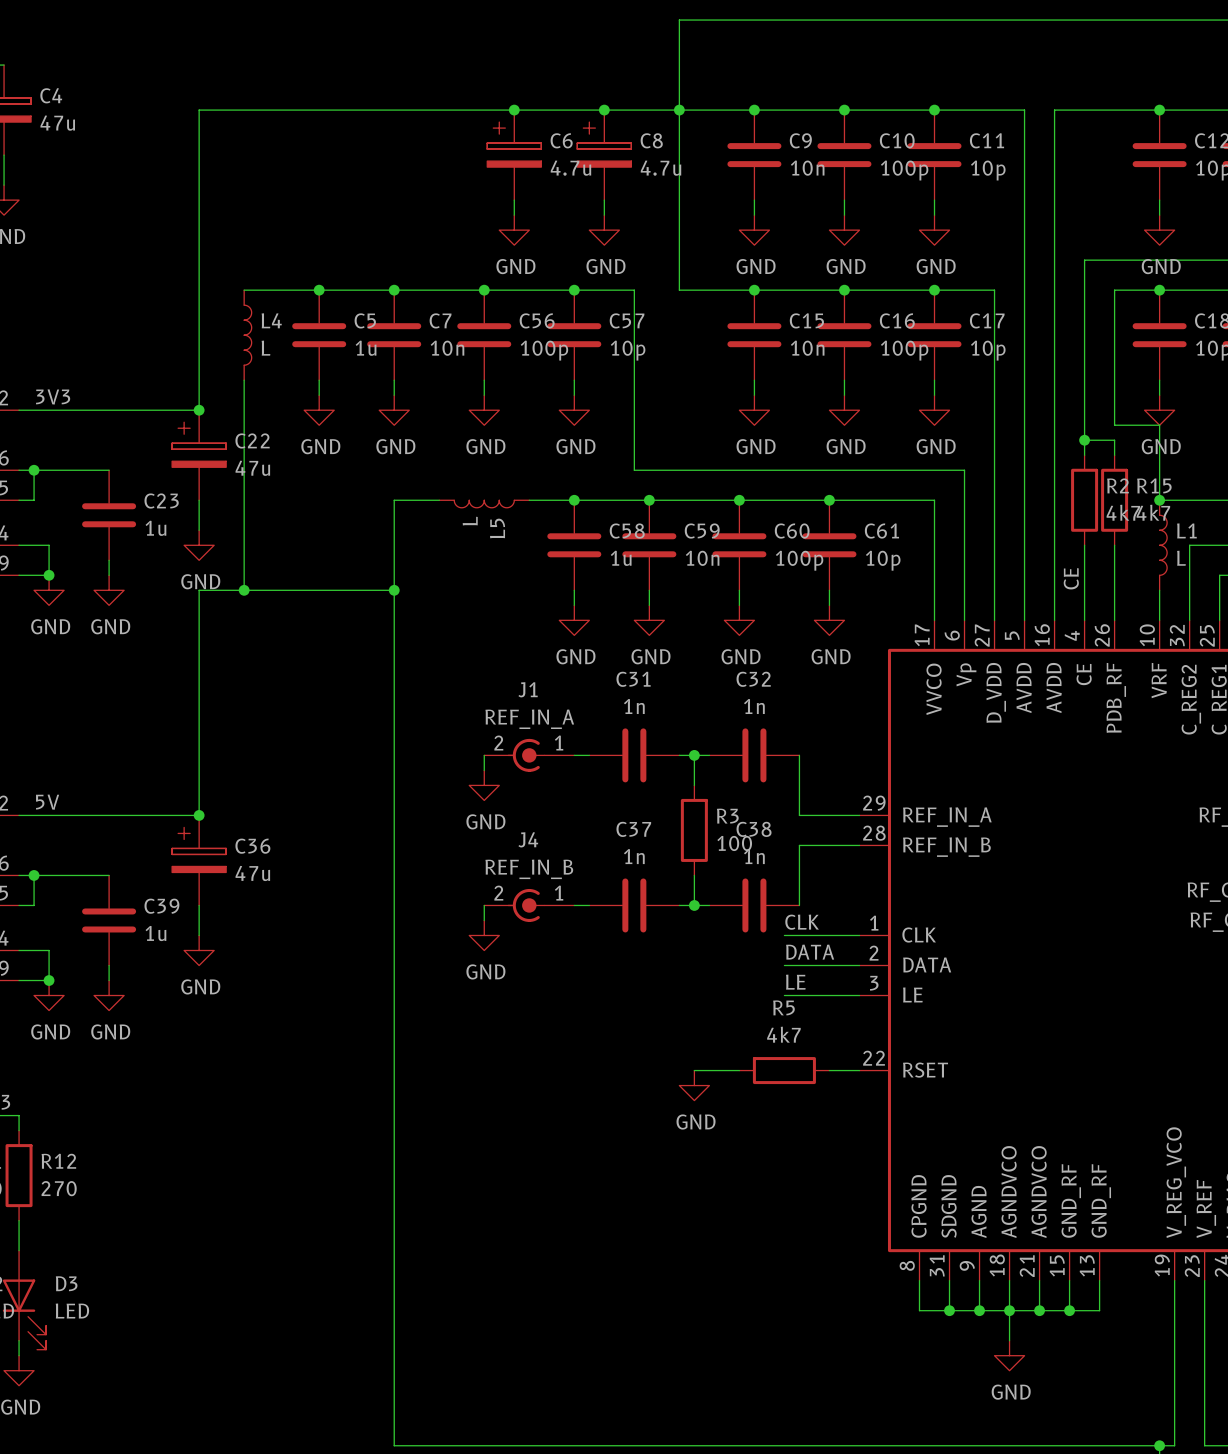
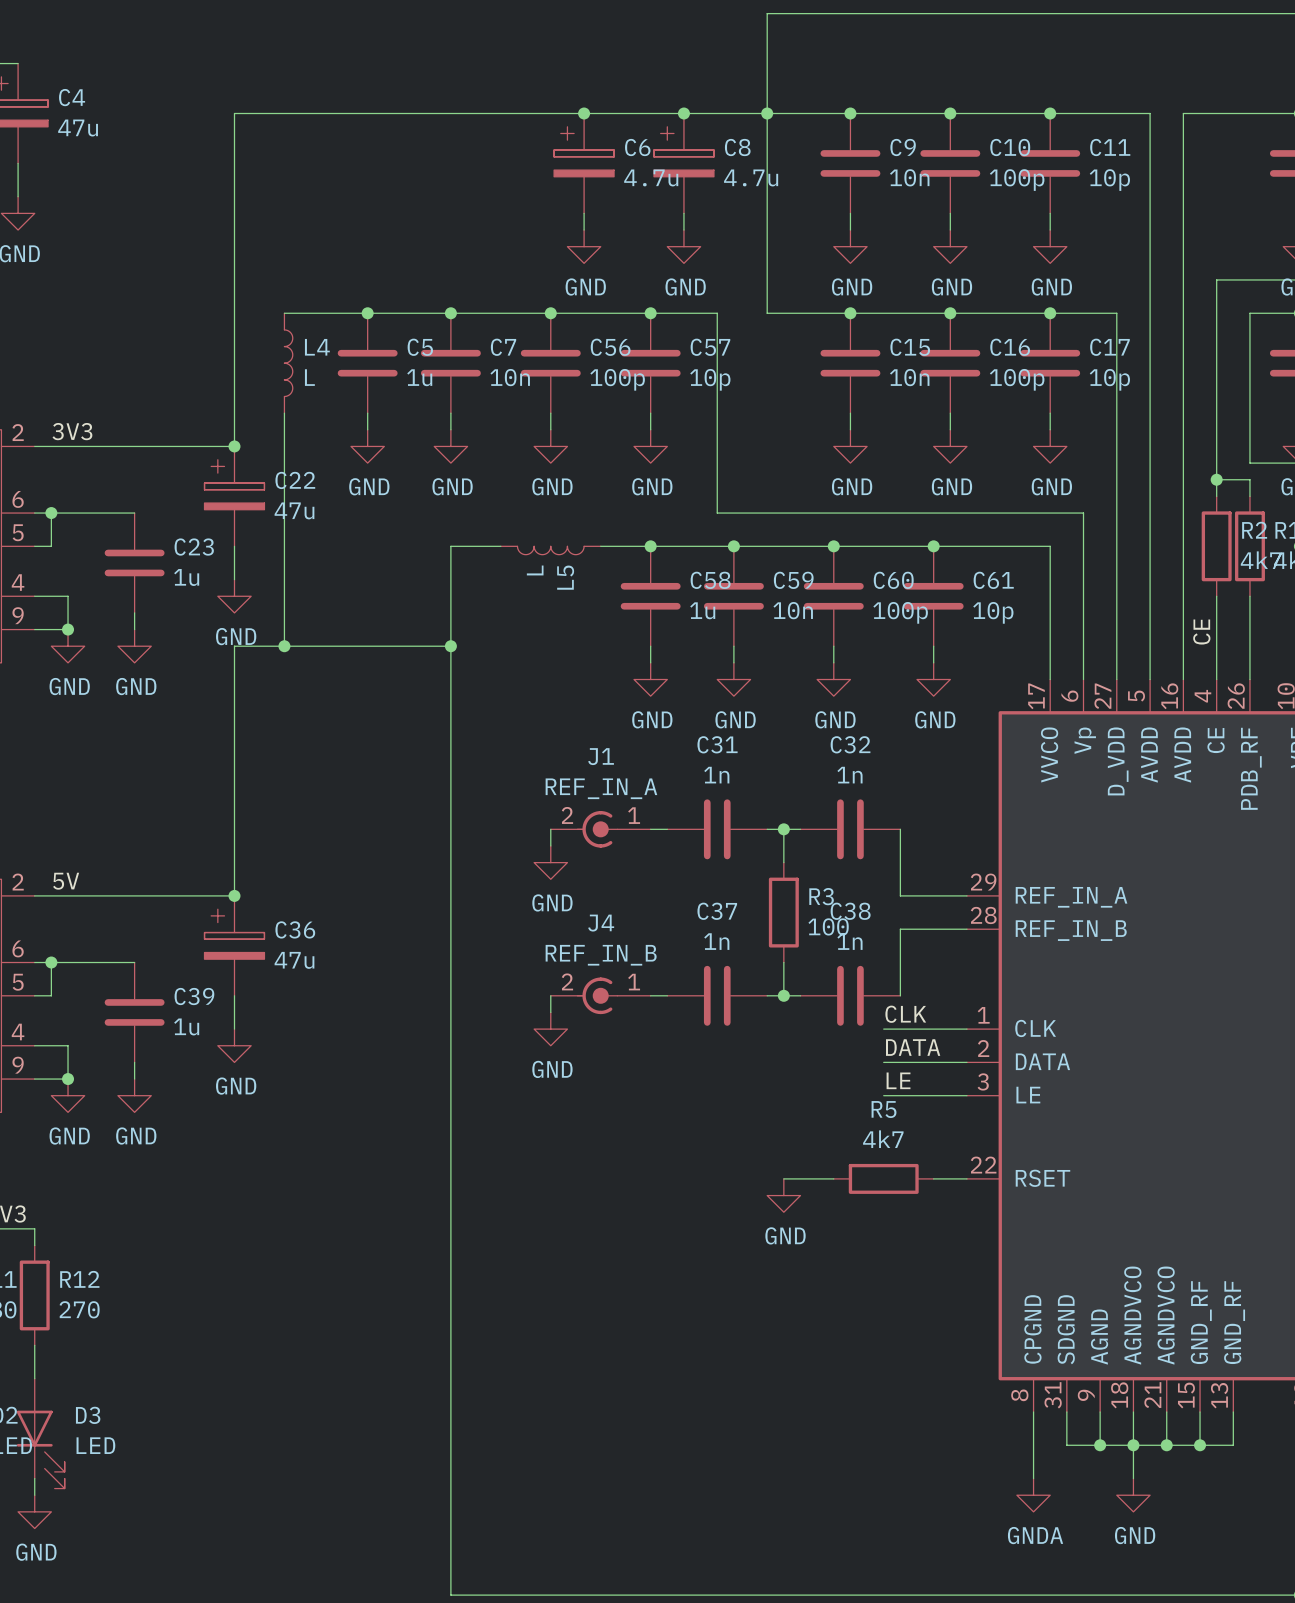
wire: (919, 1310) (949, 1310) -> (1033, 1445) (1033, 1478)
junction: (949, 1310) -> none
power symbol: none -> GNDA (1033, 1495)

